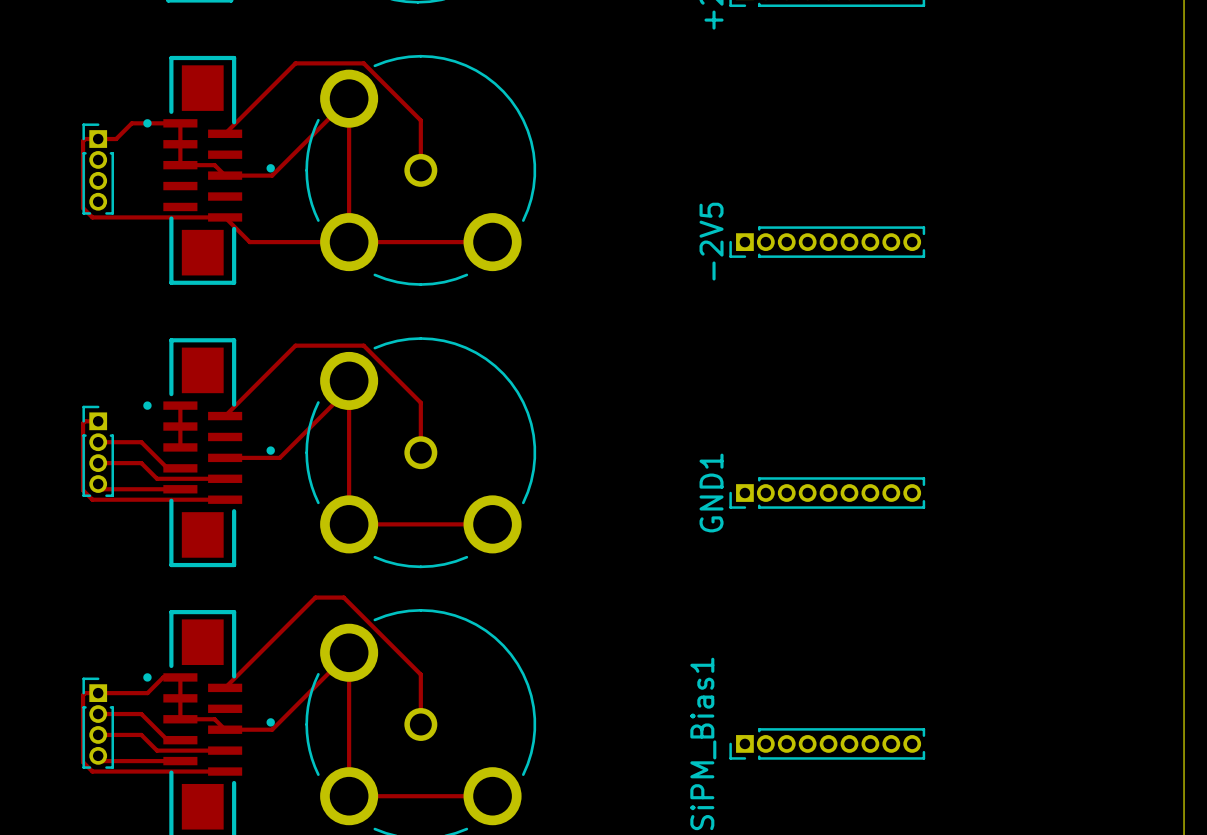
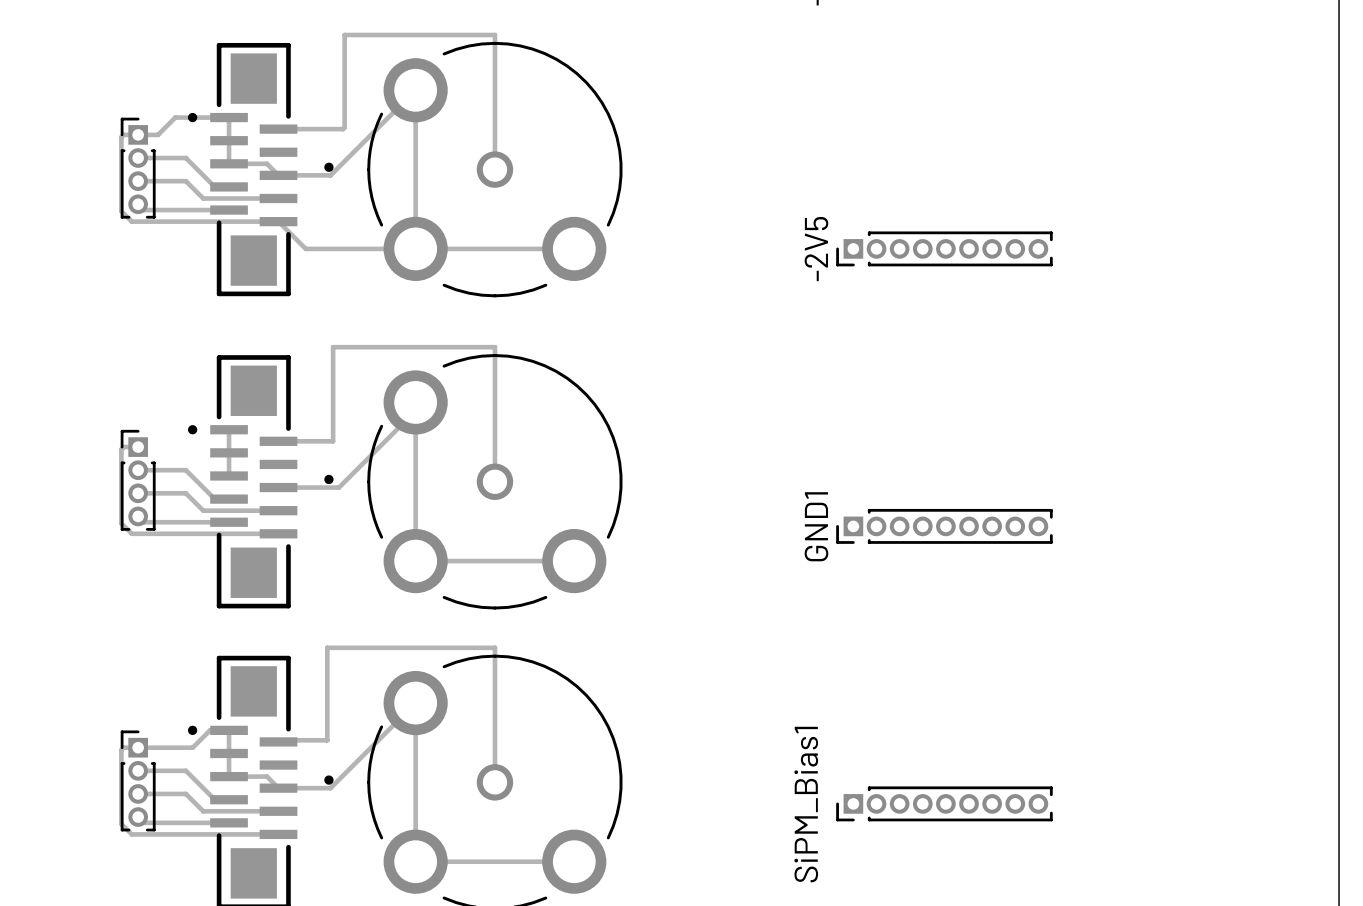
track: (420, 120) (363, 63) (295, 63) (225, 133) -> (494, 114) (494, 35) (344, 35) (344, 127) (343, 129) (278, 129)
track: none -> (138, 158) (185, 158) (214, 186) (229, 186)
track: none -> (138, 181) (185, 181) (203, 198) (278, 198)
track: none -> (138, 204) (143, 210) (229, 210)
track: (420, 402) (363, 345) (295, 345) (225, 416) -> (494, 426) (494, 347) (333, 347) (333, 441) (278, 441)
track: (420, 674) (343, 597) (315, 597) (226, 686) -> (494, 727) (494, 647) (327, 647) (327, 740) (280, 740)

